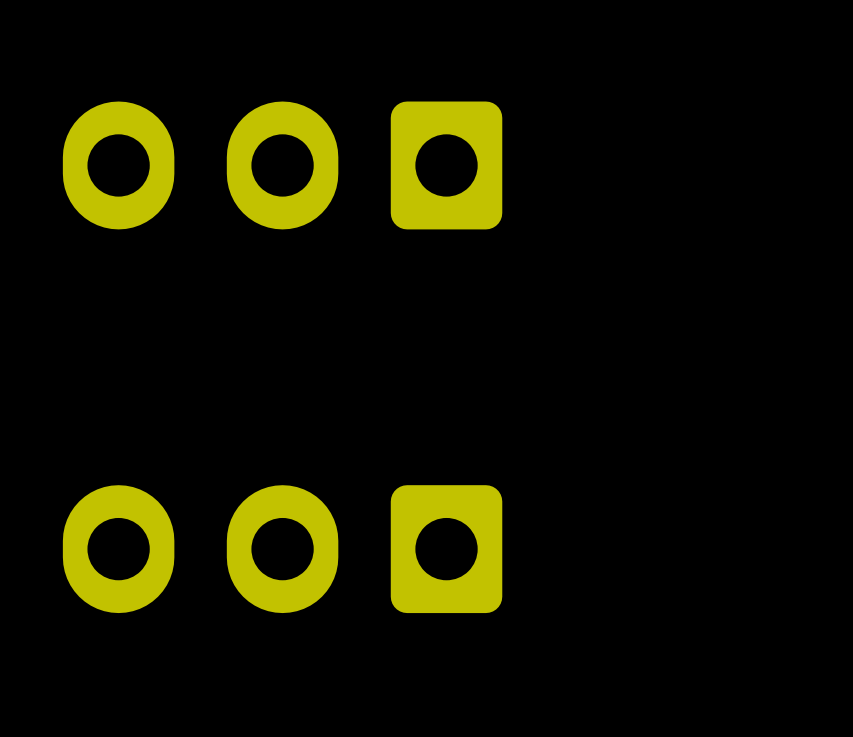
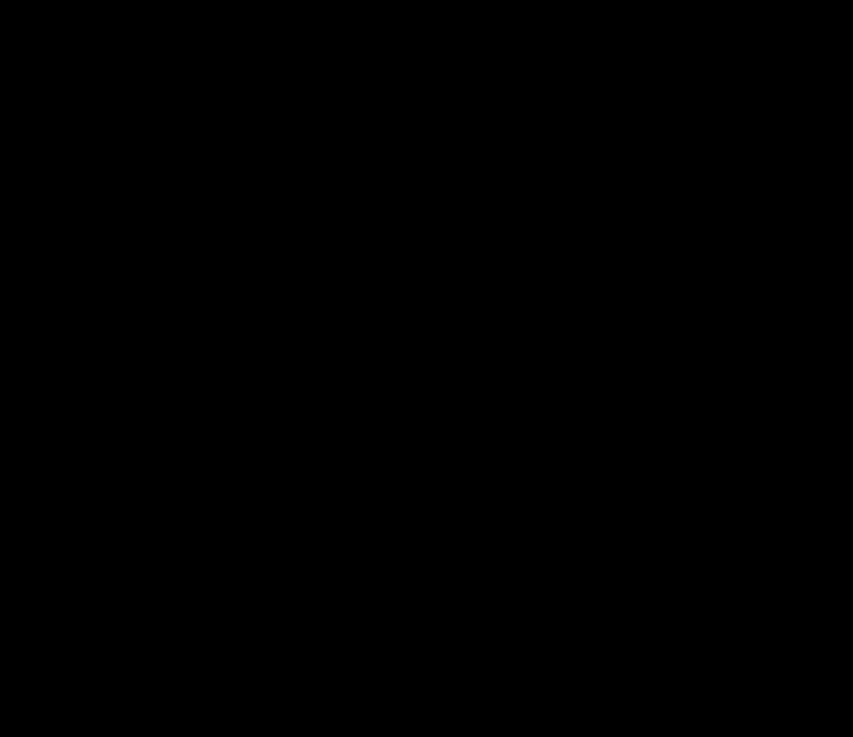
part: (282, 165) -> none
part: (282, 549) -> none

